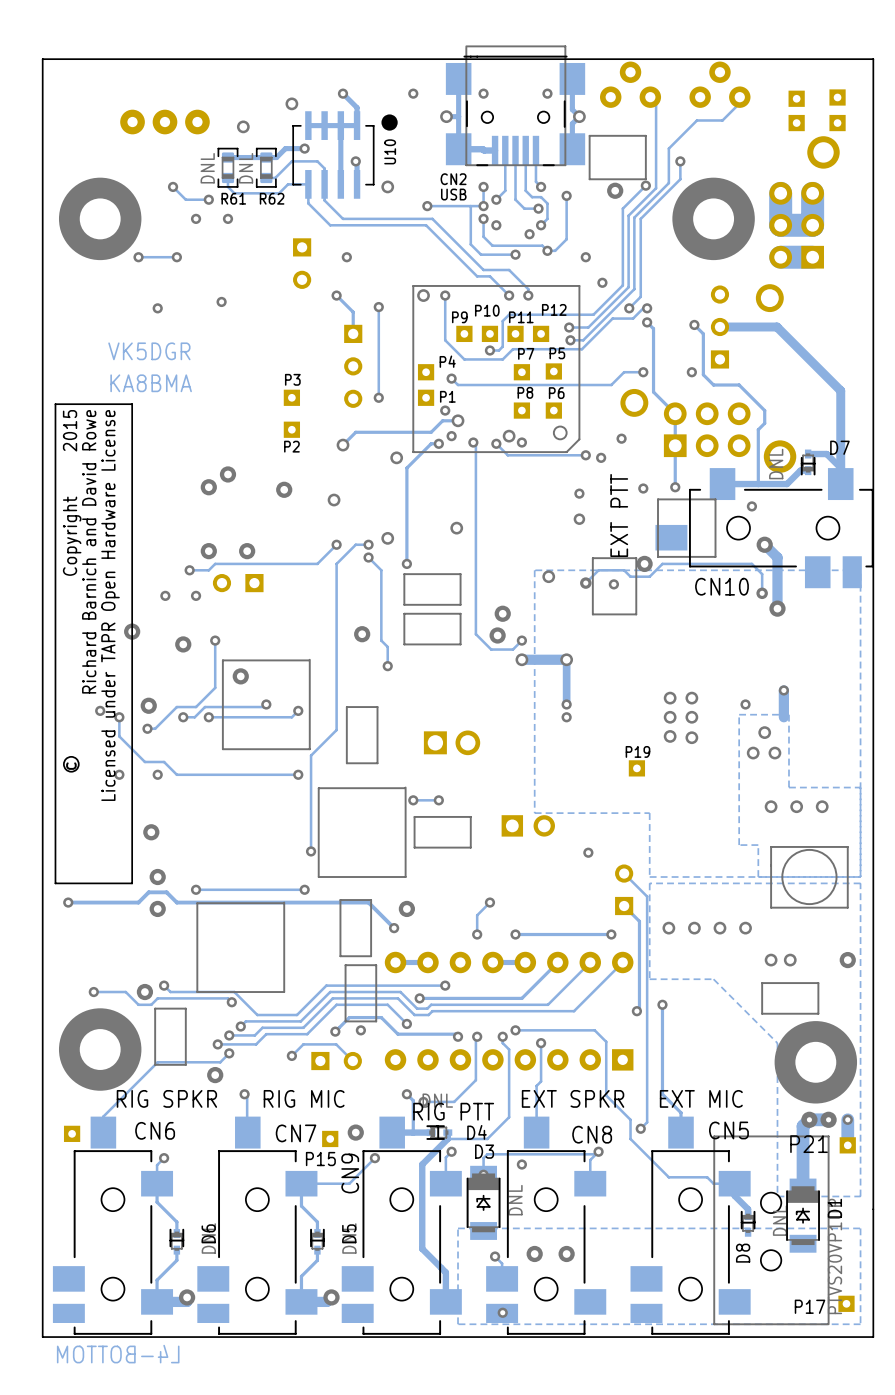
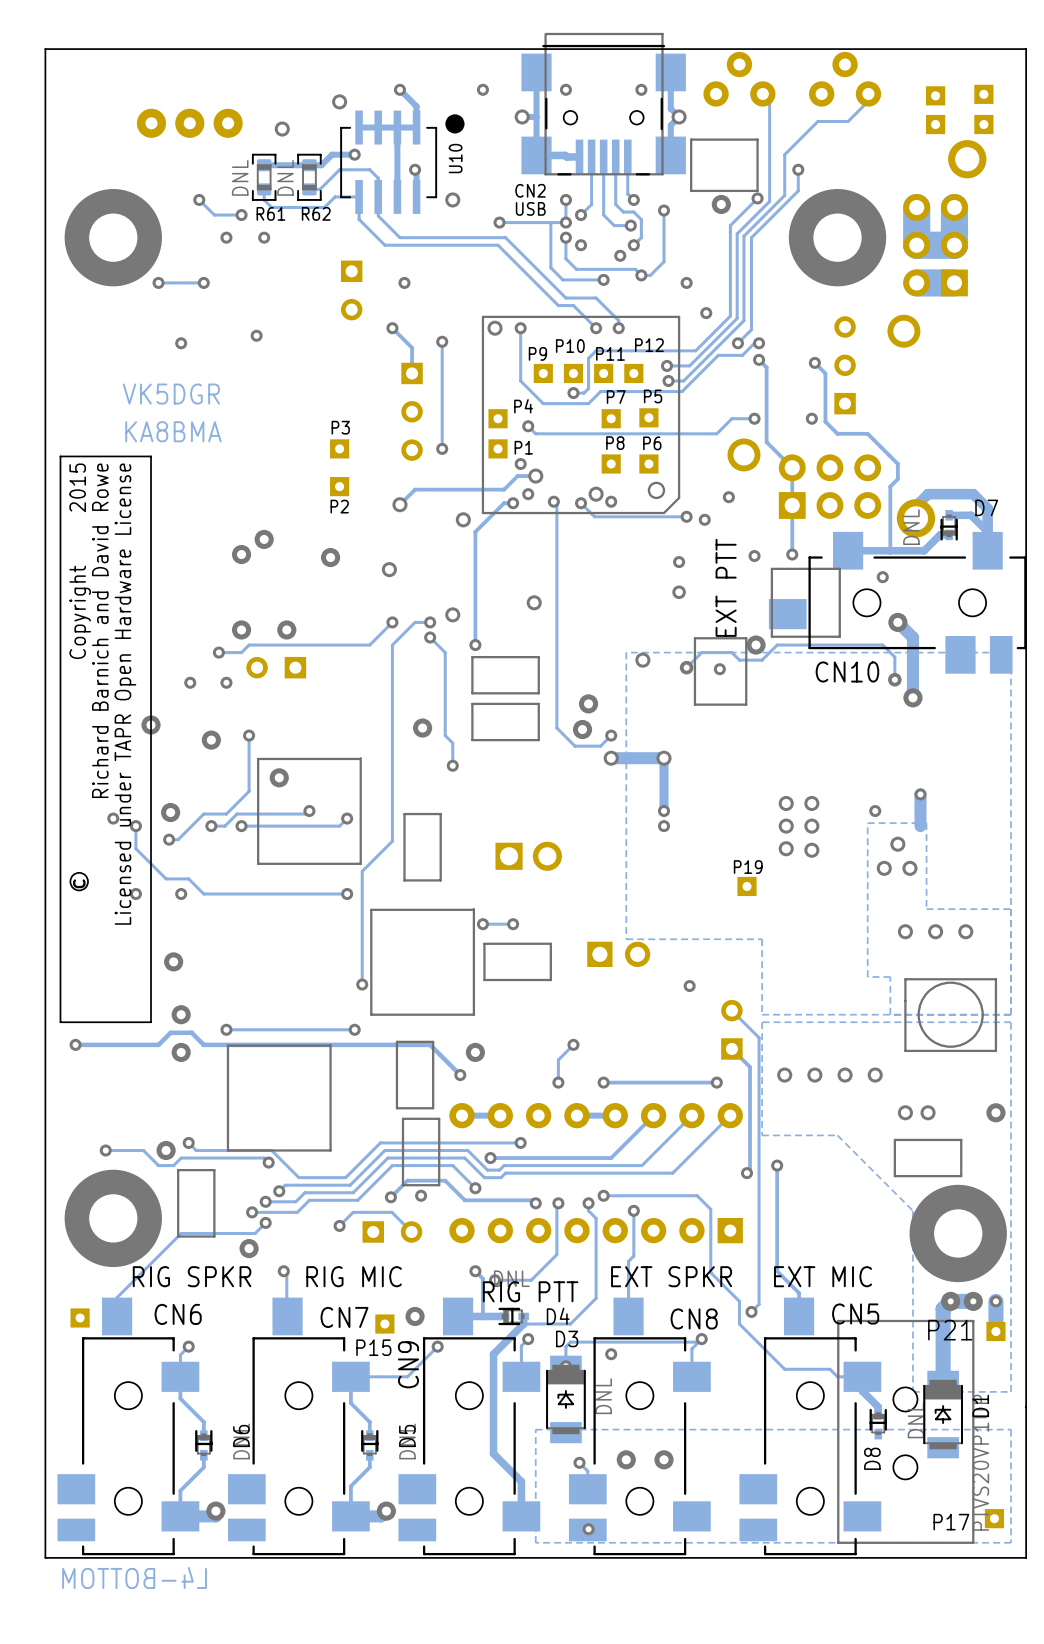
track: (719, 327) (776, 327) (840, 390) (840, 448) -> (915, 518) (915, 506) (928, 494) (973, 494) (987, 508)

